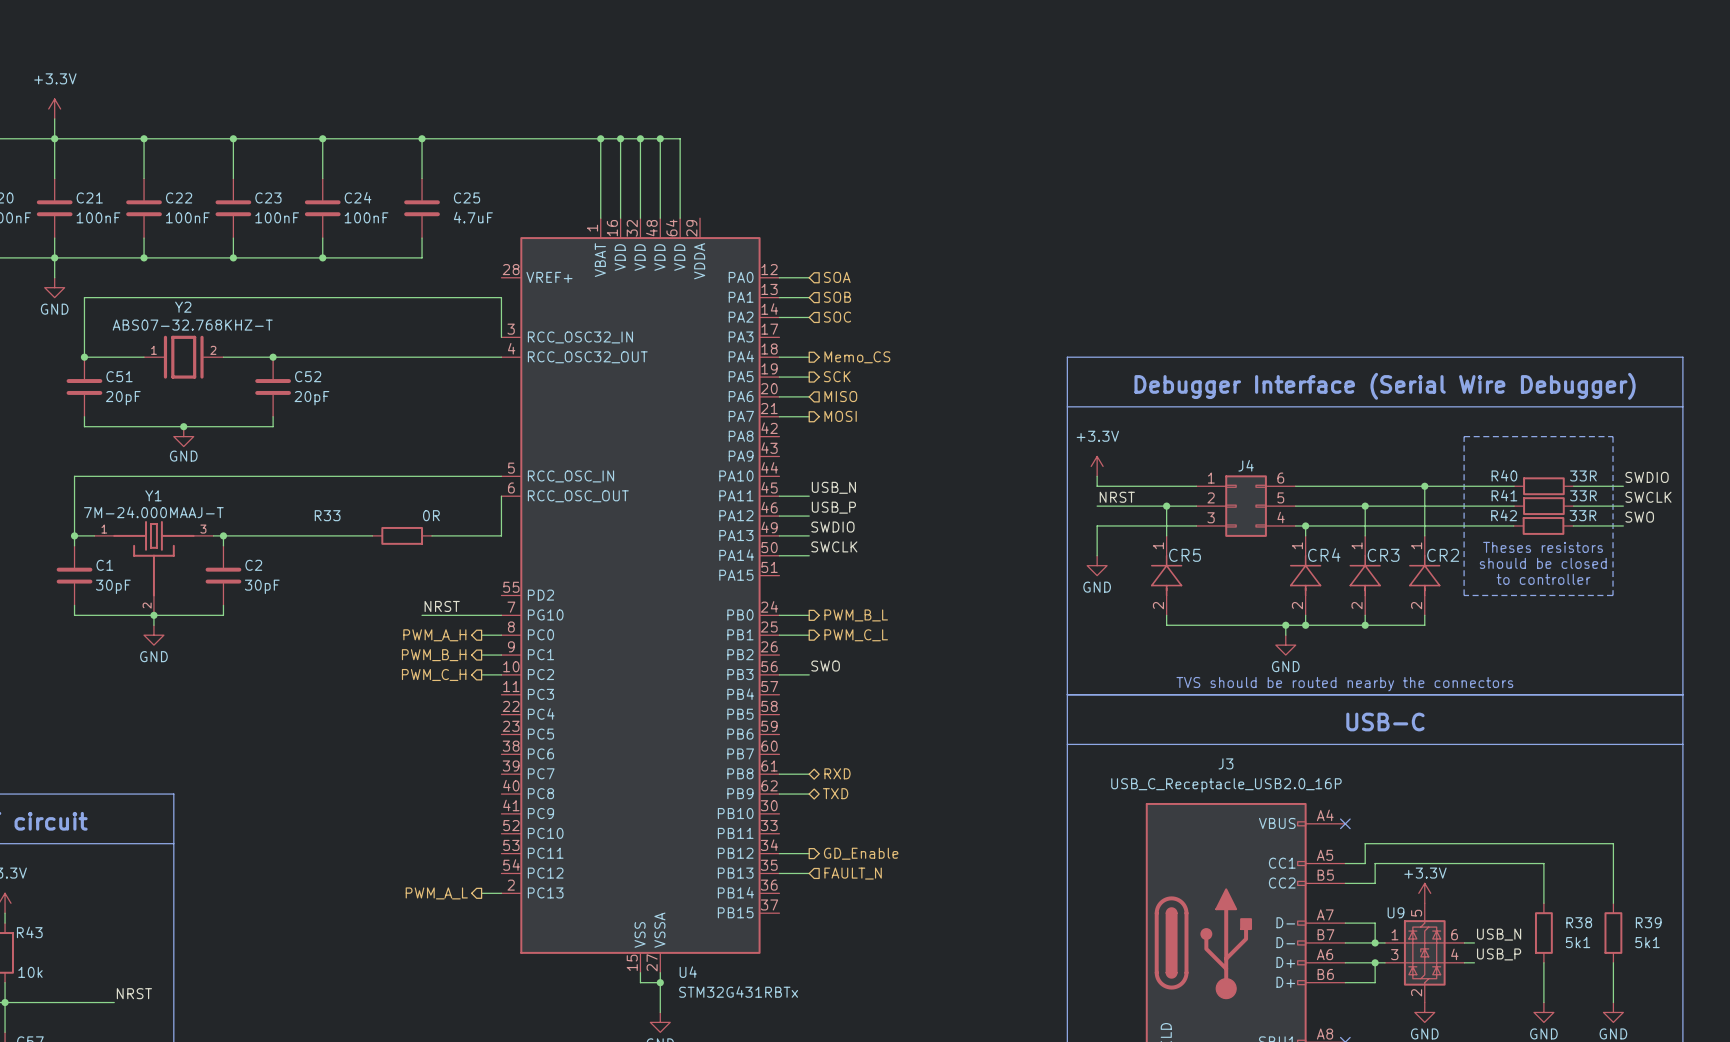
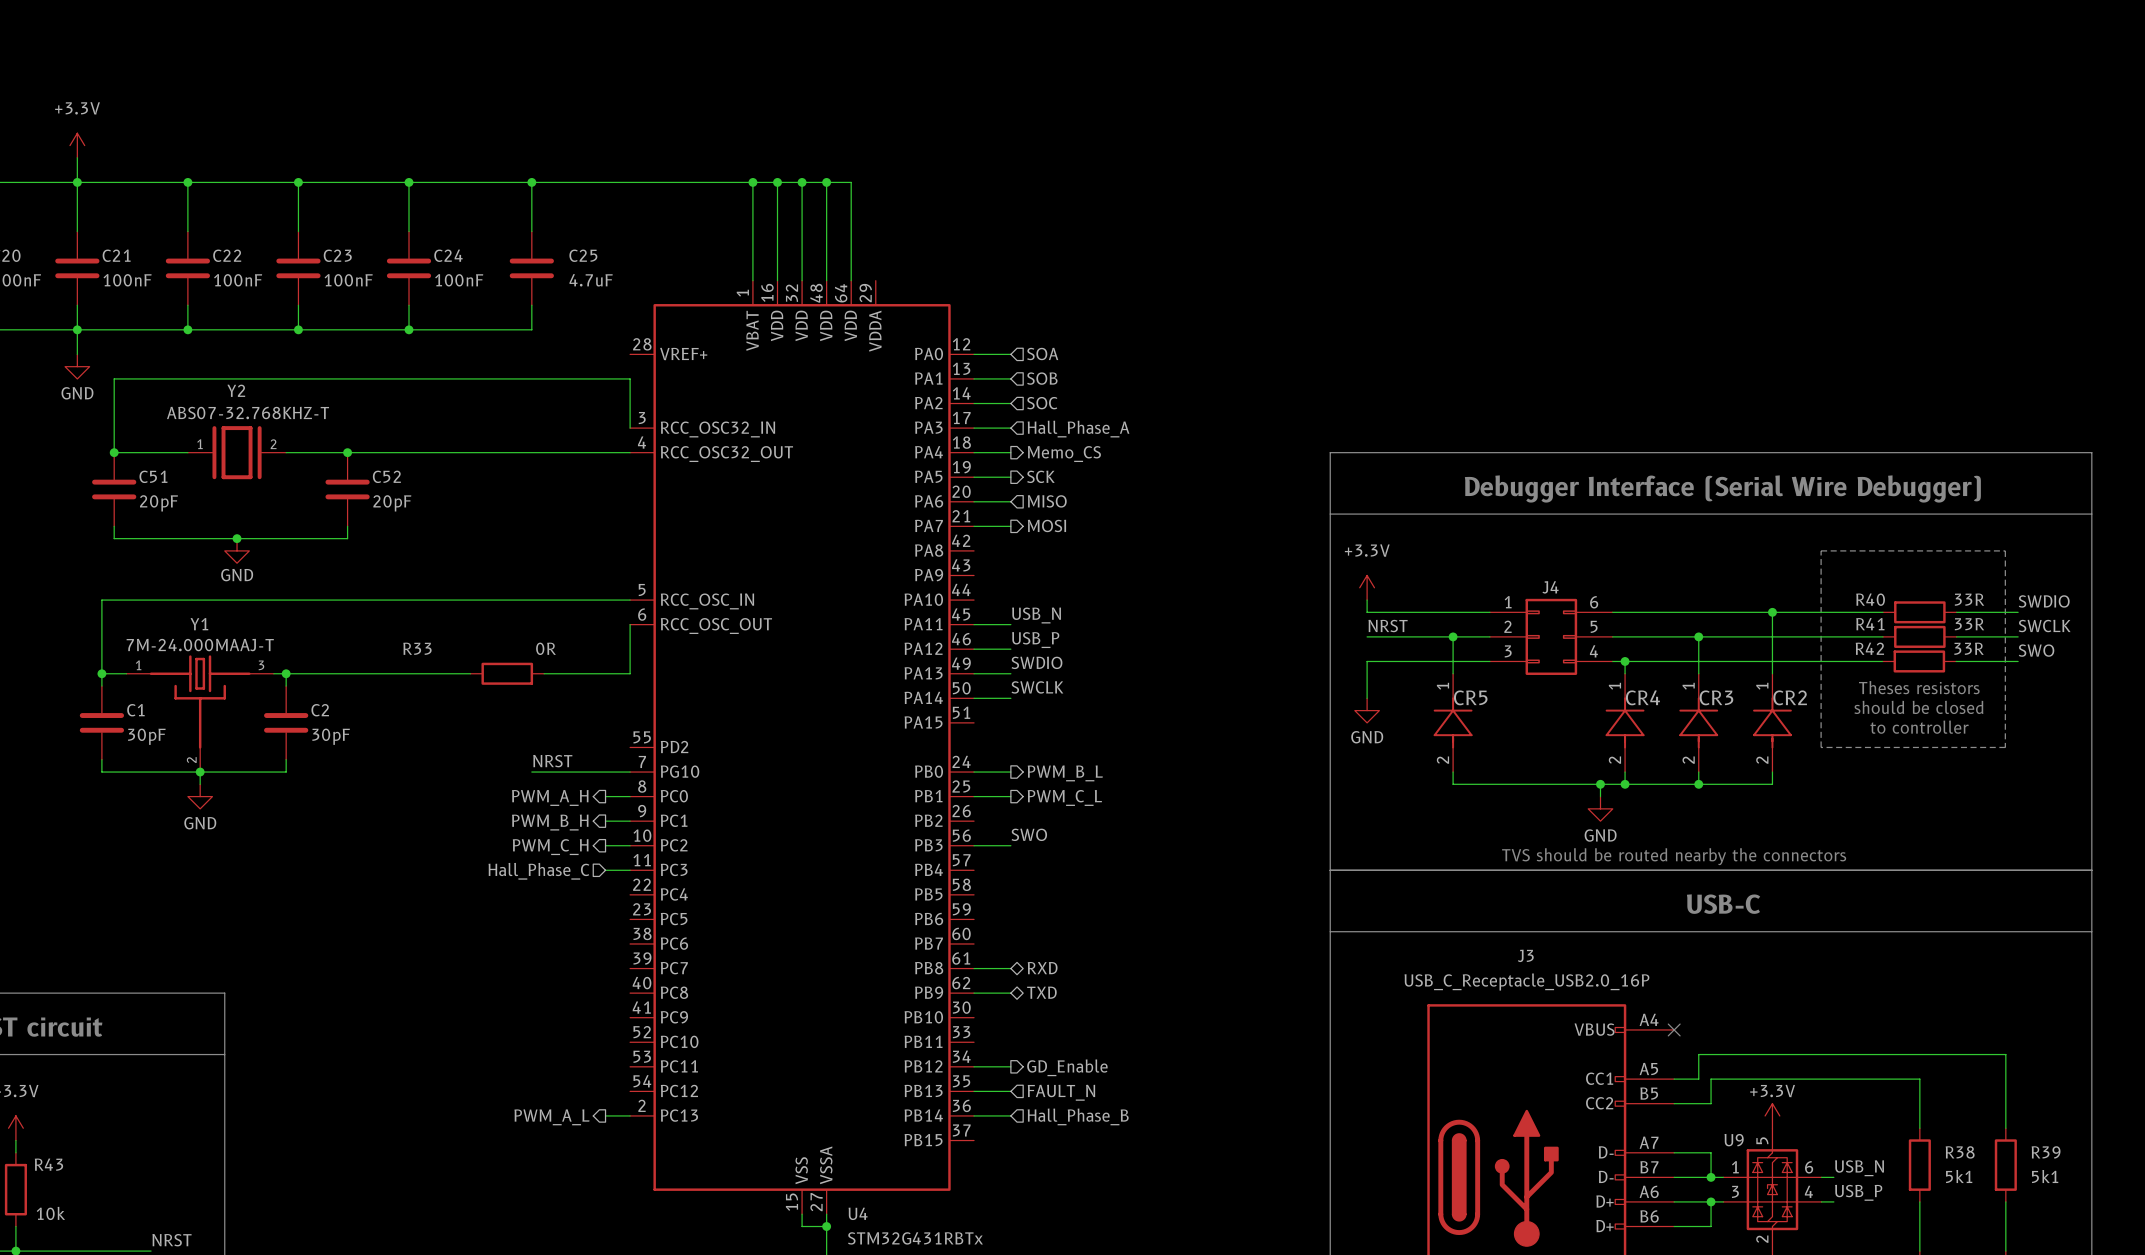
wire: none -> (974, 428) (1010, 428)
hierarchical label: none -> Hall_Phase_A (1078, 429)
hierarchical label: none -> Hall_Phase_C (538, 871)
wire: none -> (605, 870) (630, 870)
wire: none -> (974, 1115) (1010, 1115)
hierarchical label: none -> Hall_Phase_B (1078, 1116)

